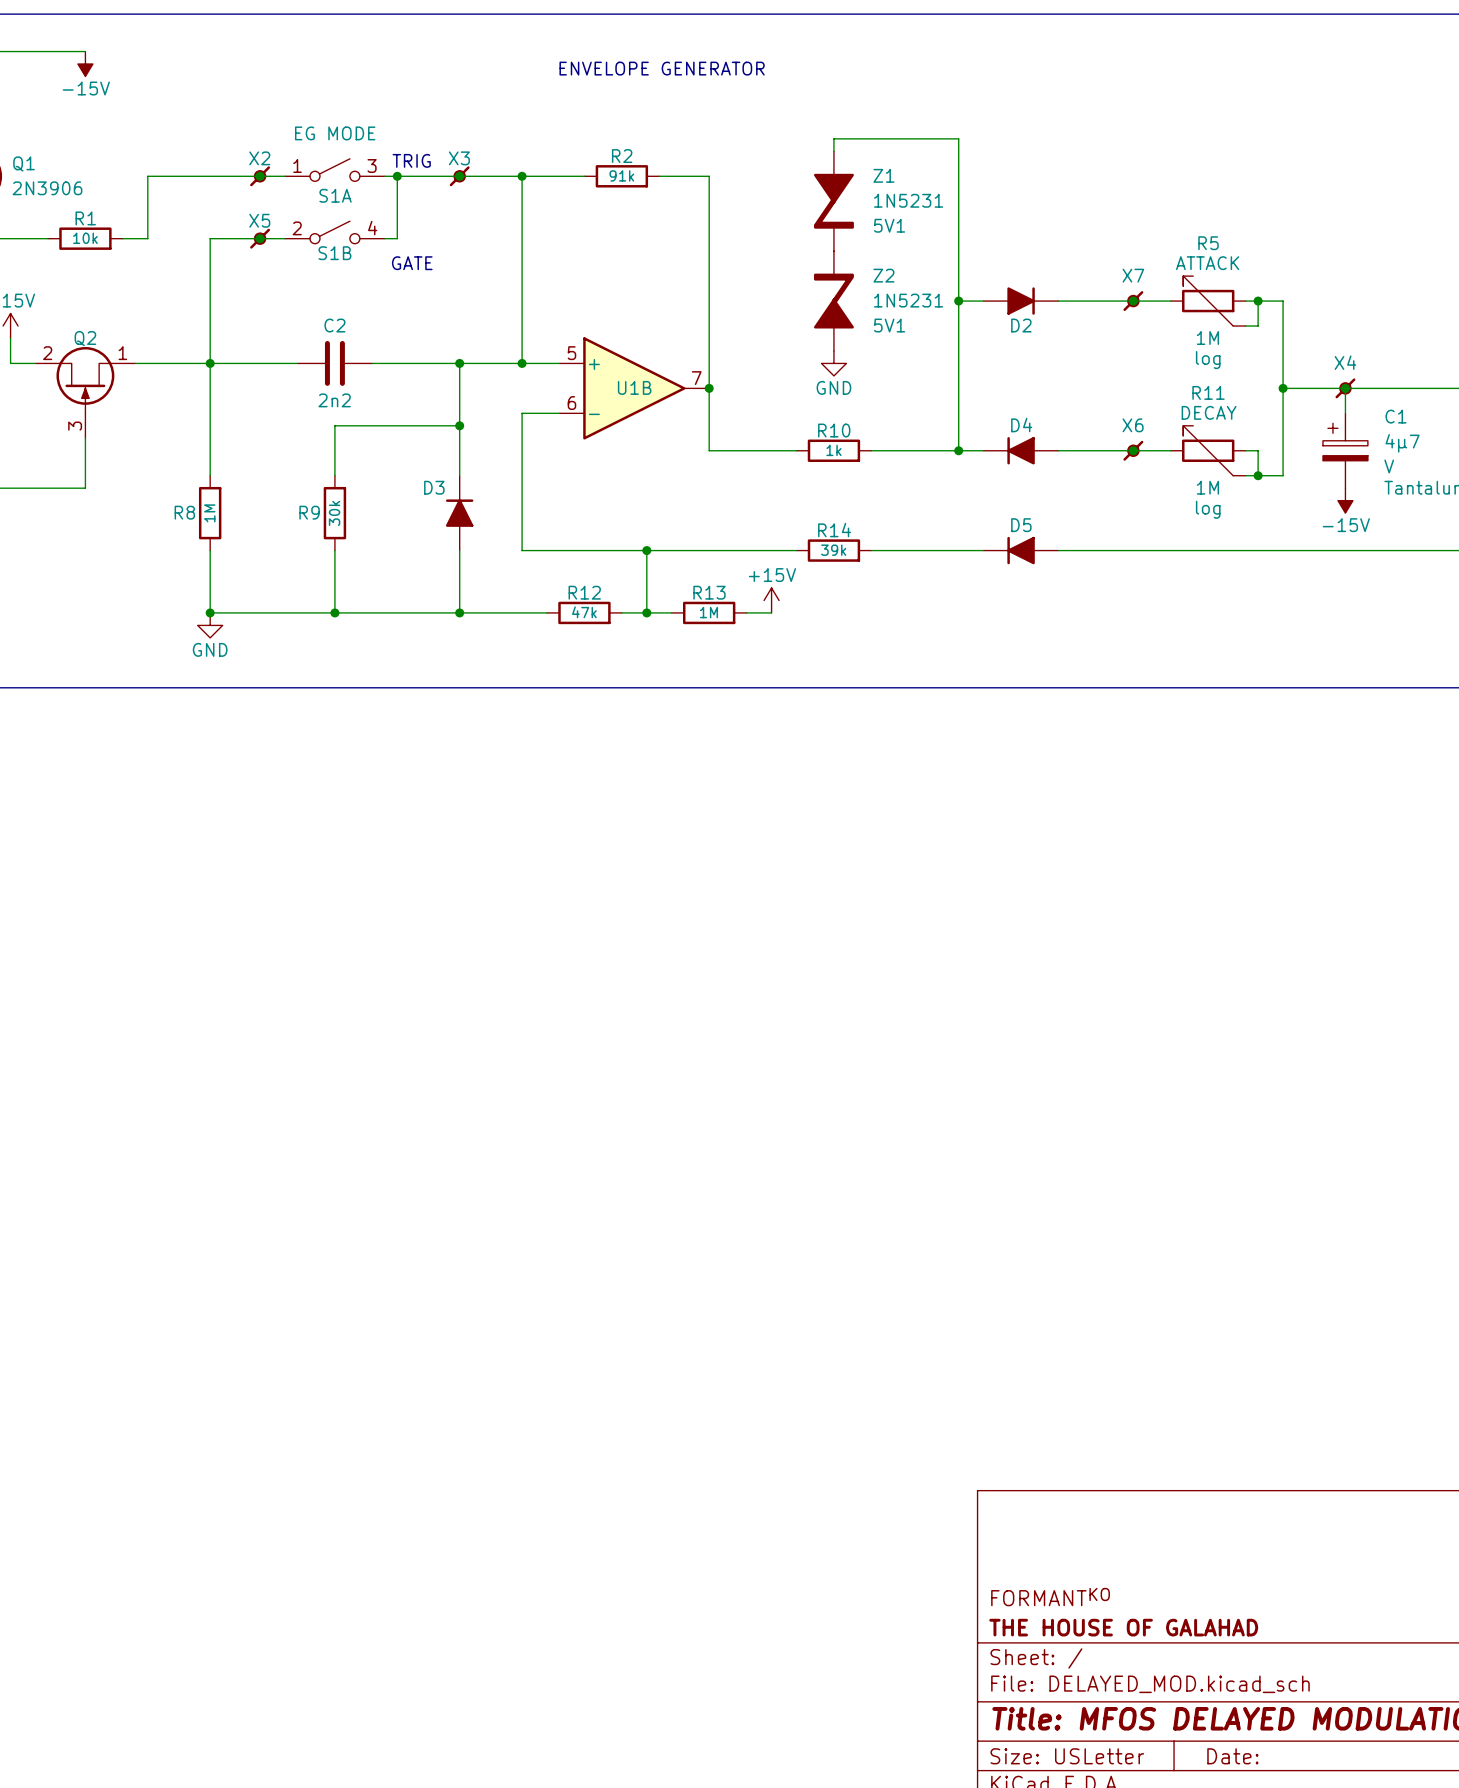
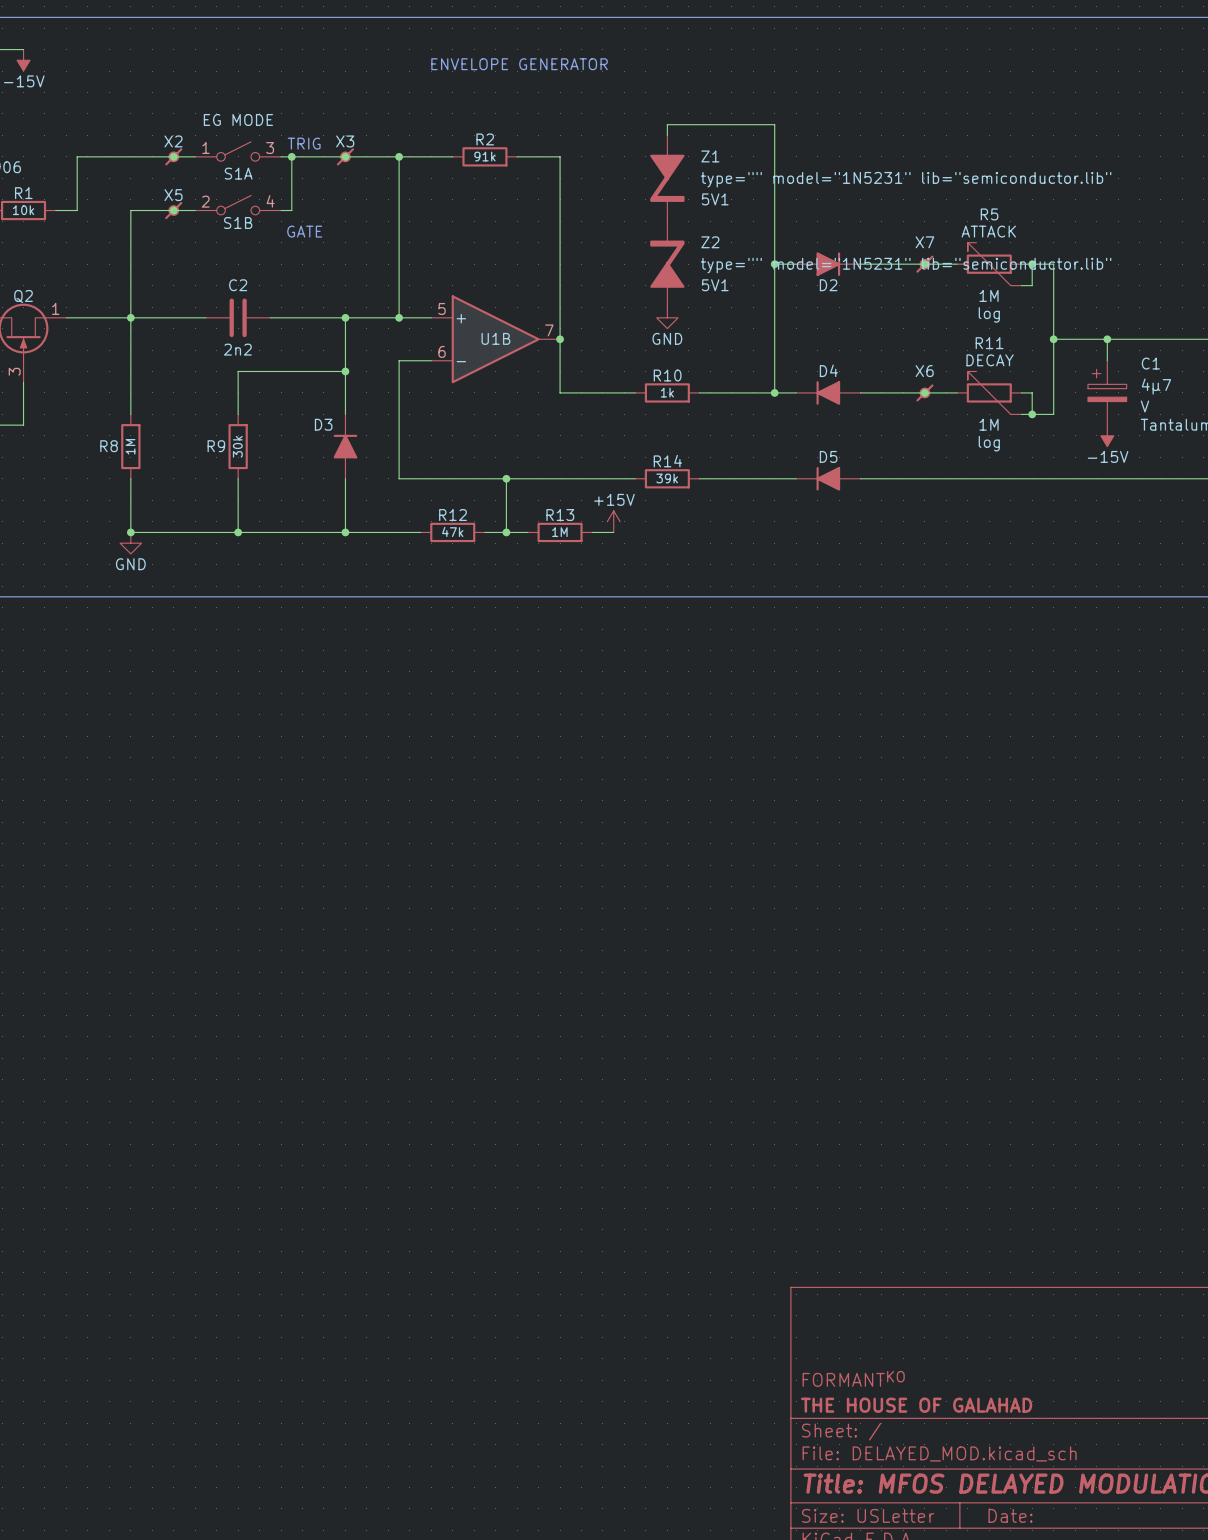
Z1 value: 1N5231 (908, 200) -> type="" model="1N5231" lib="semiconductor.lib" (906, 179)
Z2 value: 1N5231 (908, 300) -> type="" model="1N5231" lib="semiconductor.lib" (906, 265)
X4: (1345, 388) -> none

